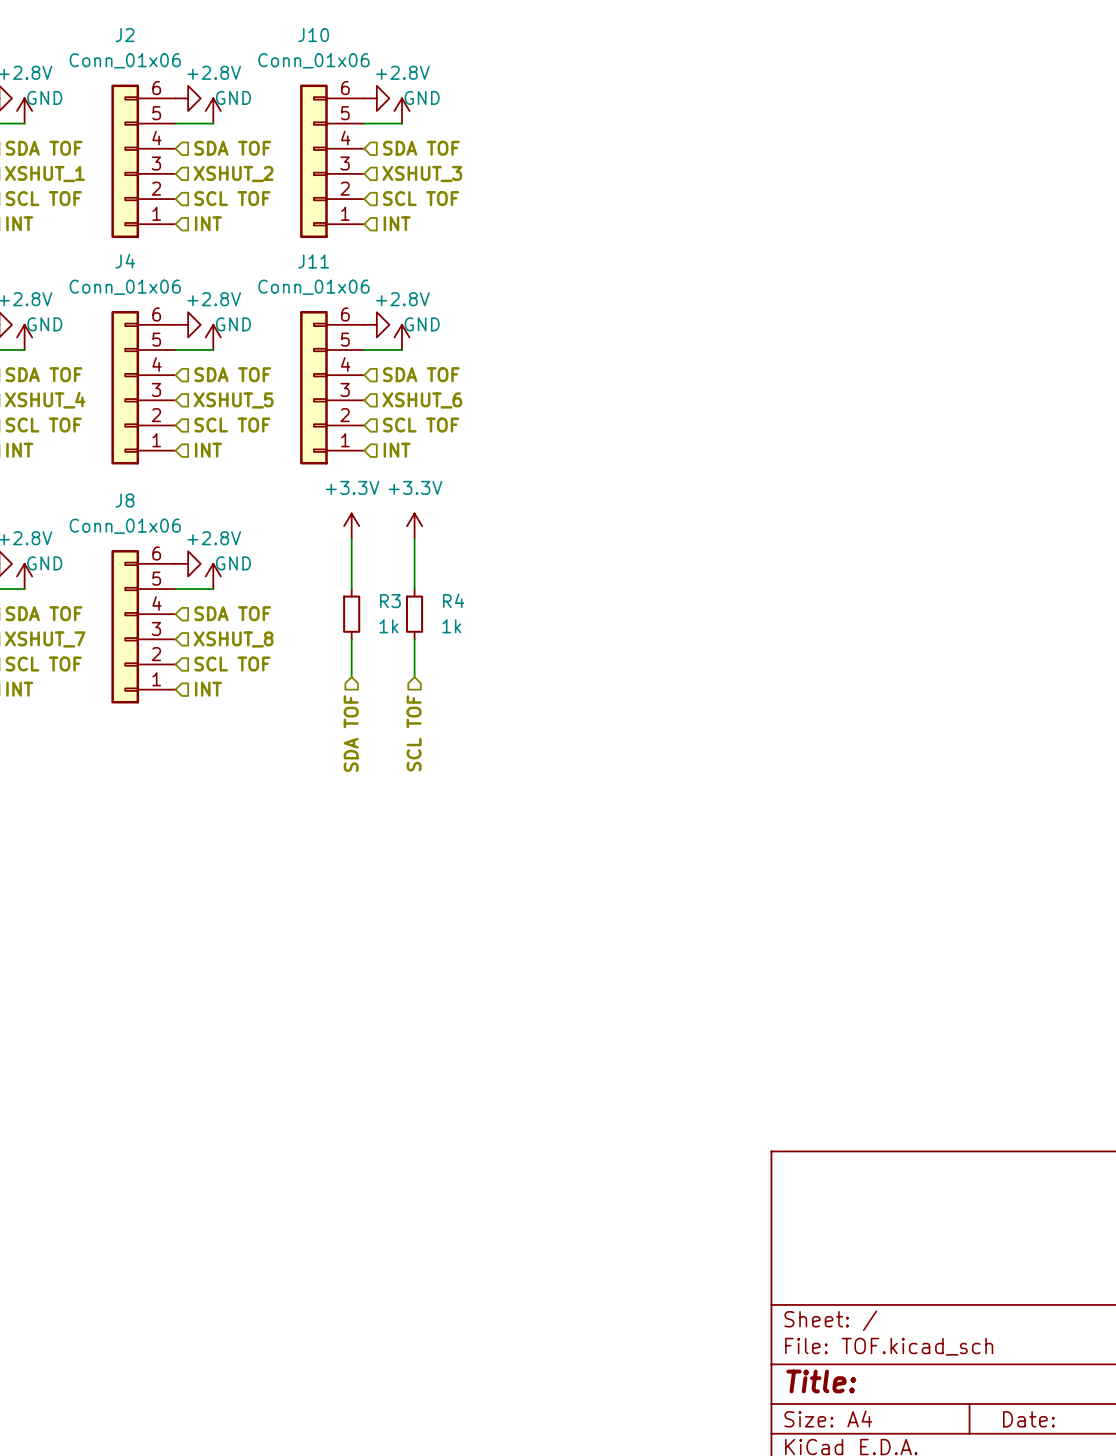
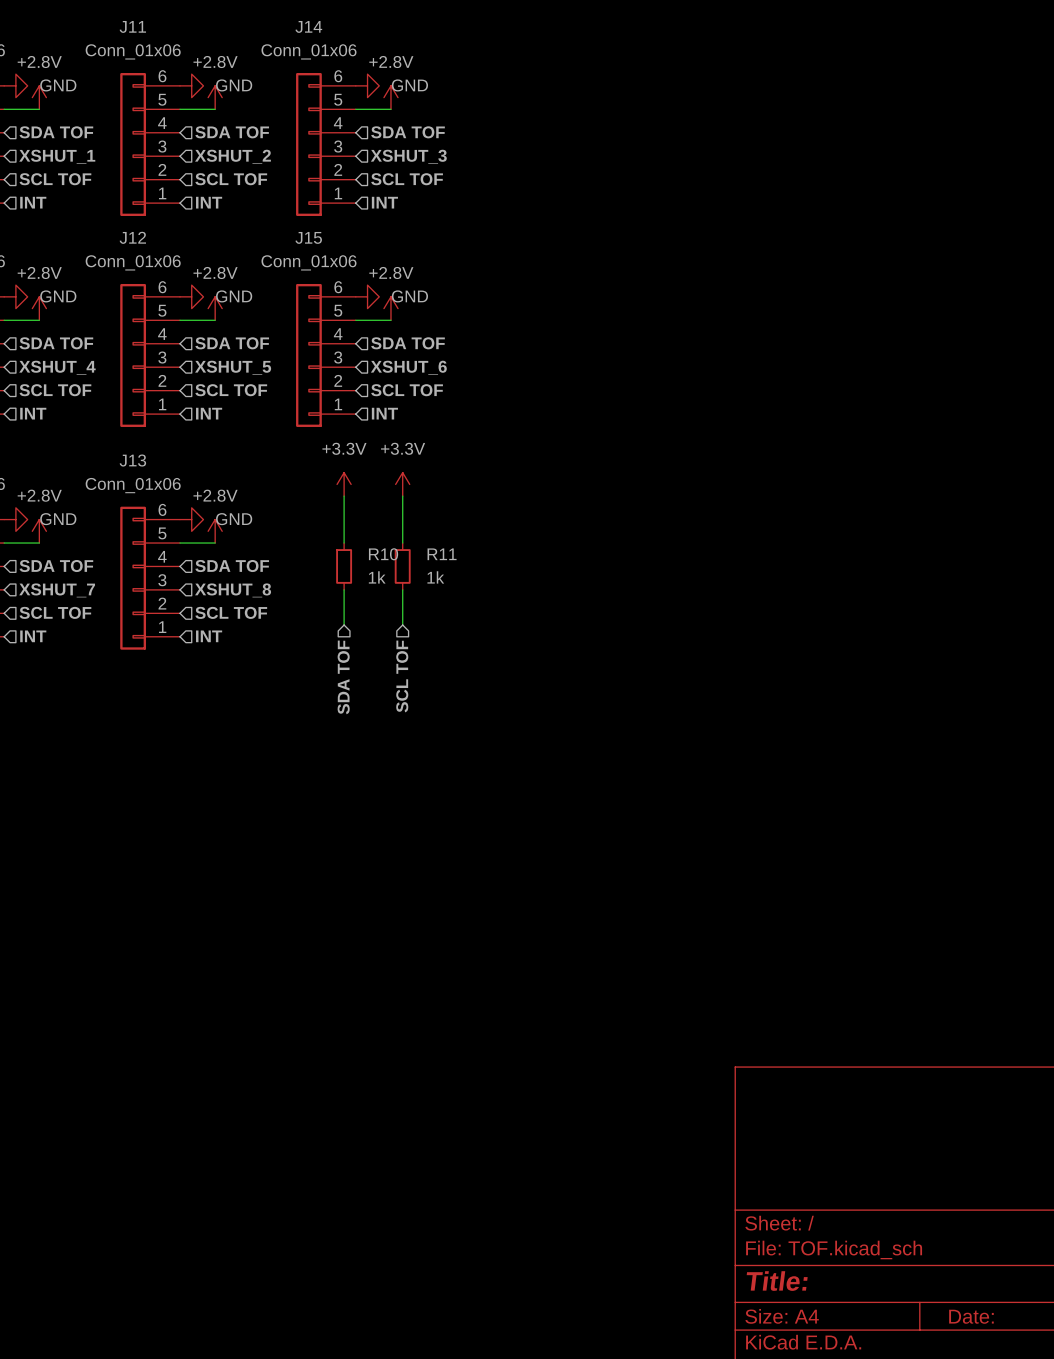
J2 name: J2 (124, 35) -> J11 (132, 26)
J10 name: J10 (313, 35) -> J14 (308, 26)
J4 name: J4 (125, 261) -> J12 (132, 237)
J11 name: J11 (313, 261) -> J15 (308, 237)
J8 name: J8 (124, 500) -> J13 (132, 460)
R4 name: R4 (453, 600) -> R11 (442, 554)
R3 name: R3 (390, 601) -> R10 (383, 554)

